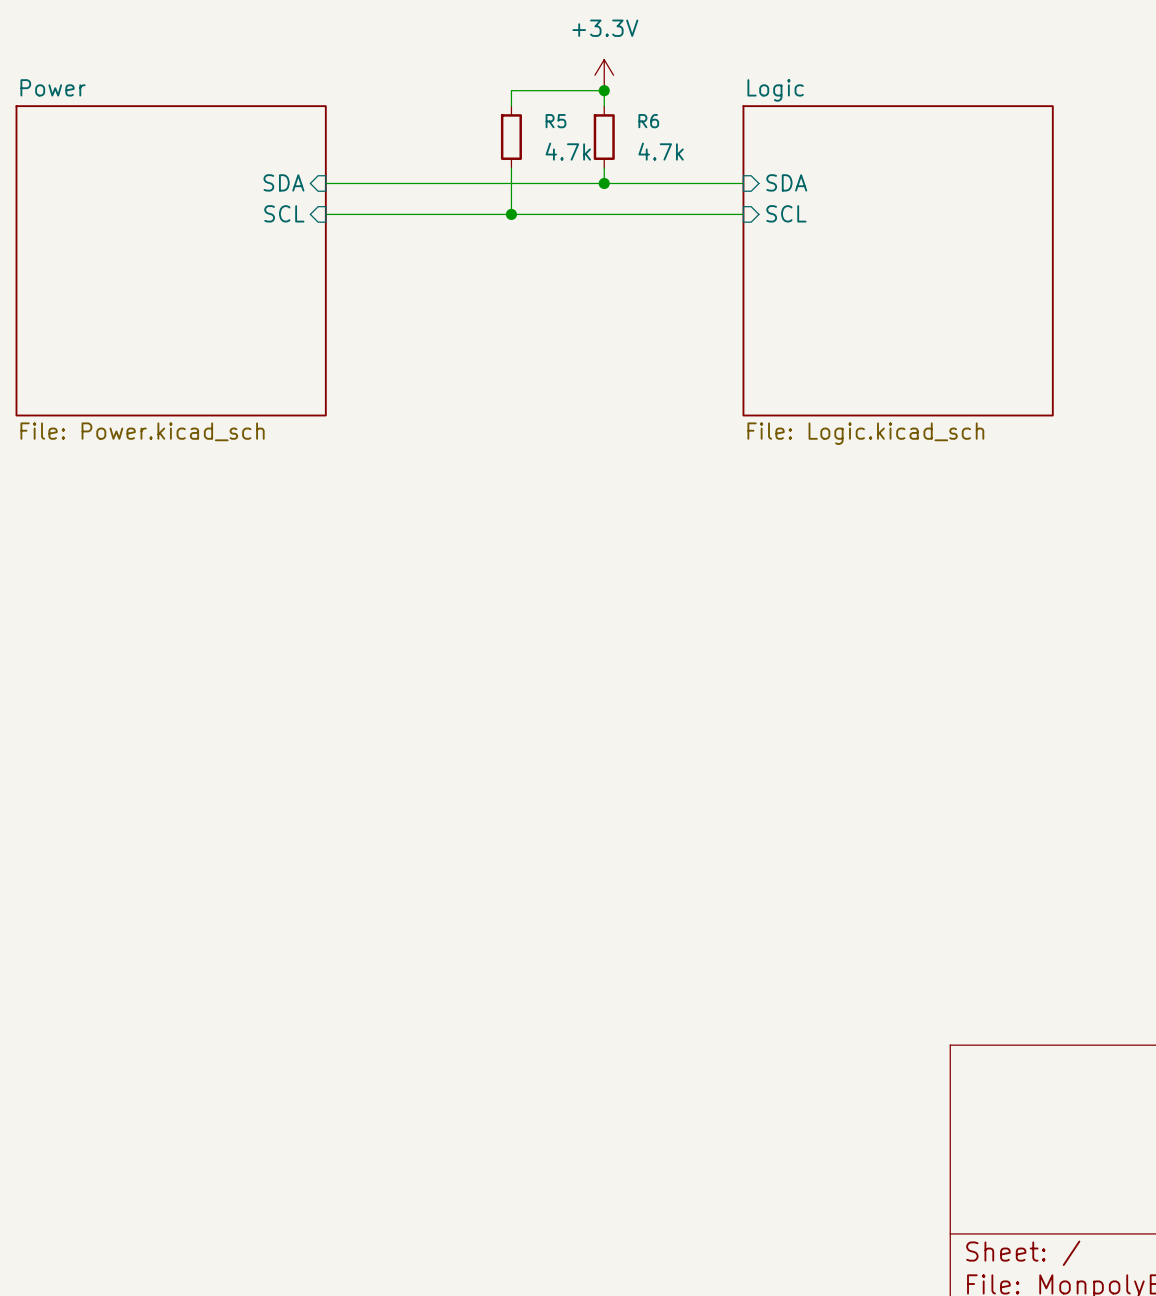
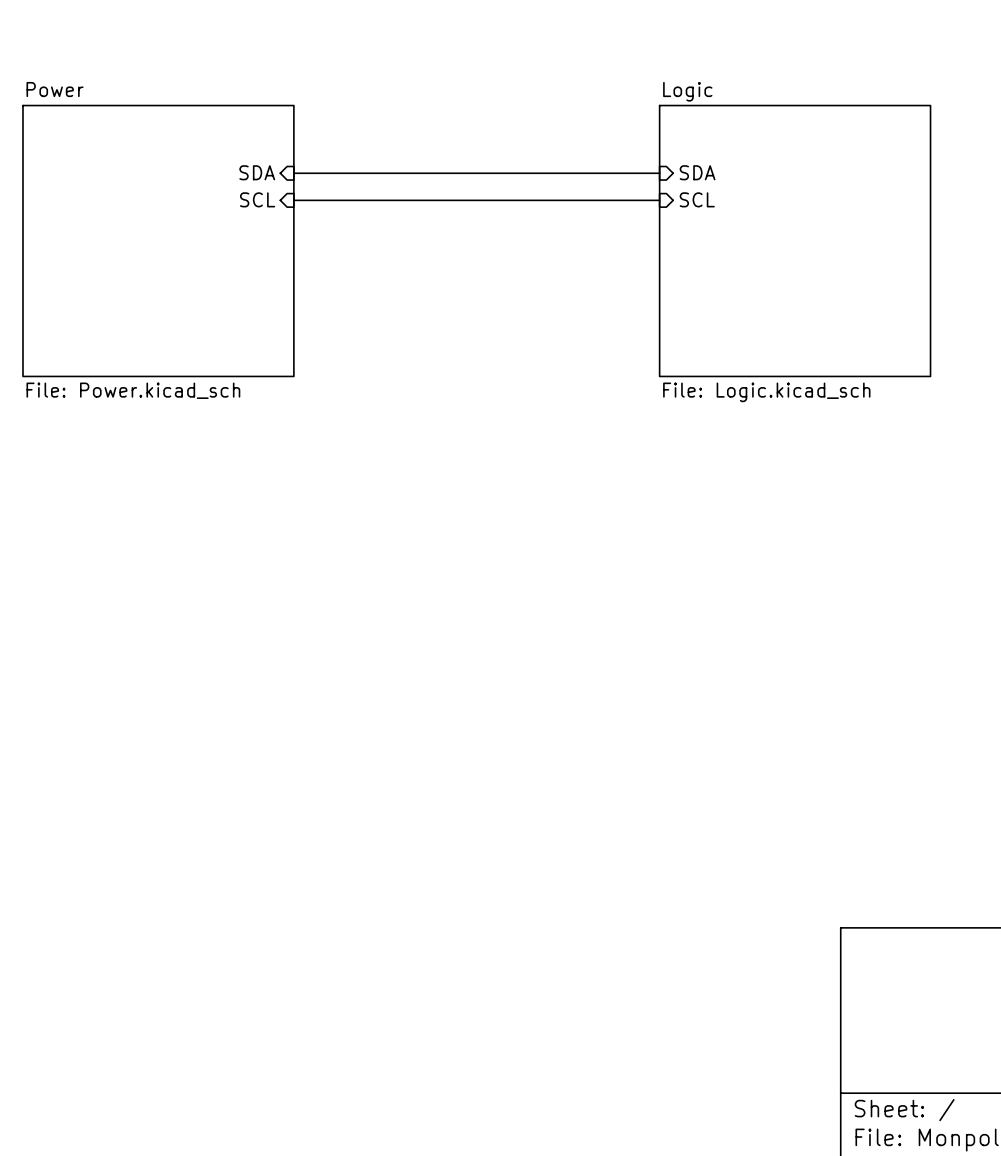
power symbol: +3.3V (604, 75) -> none
junction: (604, 90) -> none
wire: (511, 106) (511, 90) (604, 90) (604, 106) -> none
R5: 4.7k (511, 137) -> none
R6: 4.7k (604, 137) -> none
wire: (511, 168) (511, 214) -> none
wire: (604, 168) (604, 183) -> none
junction: (604, 183) -> none
junction: (511, 214) -> none

